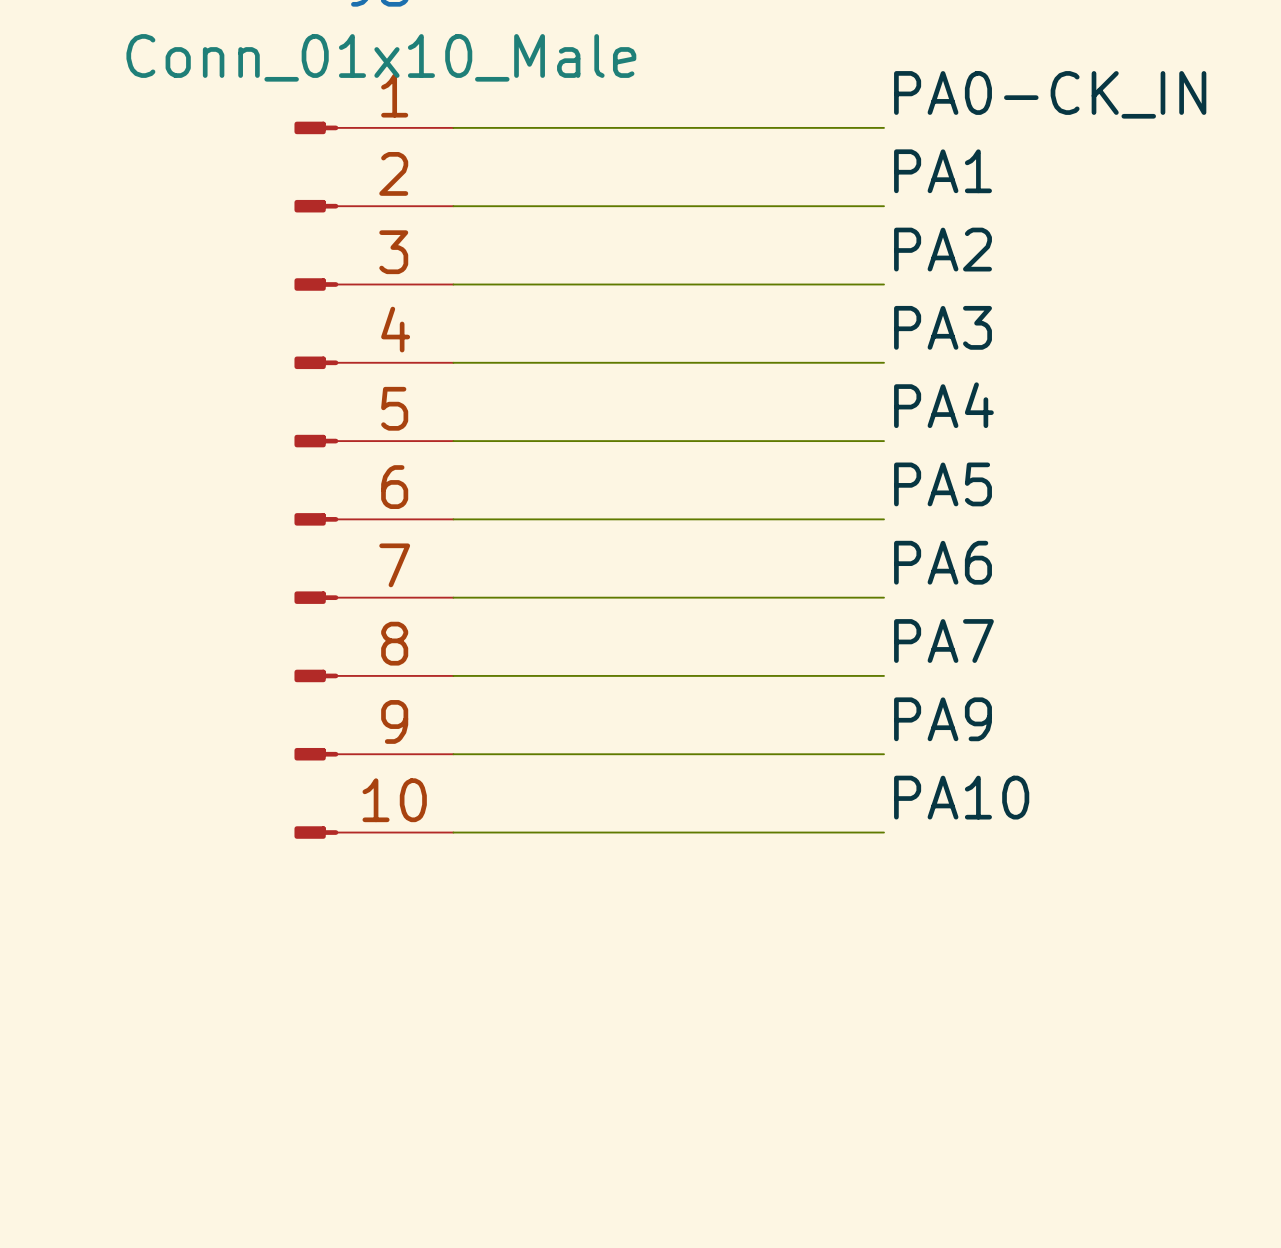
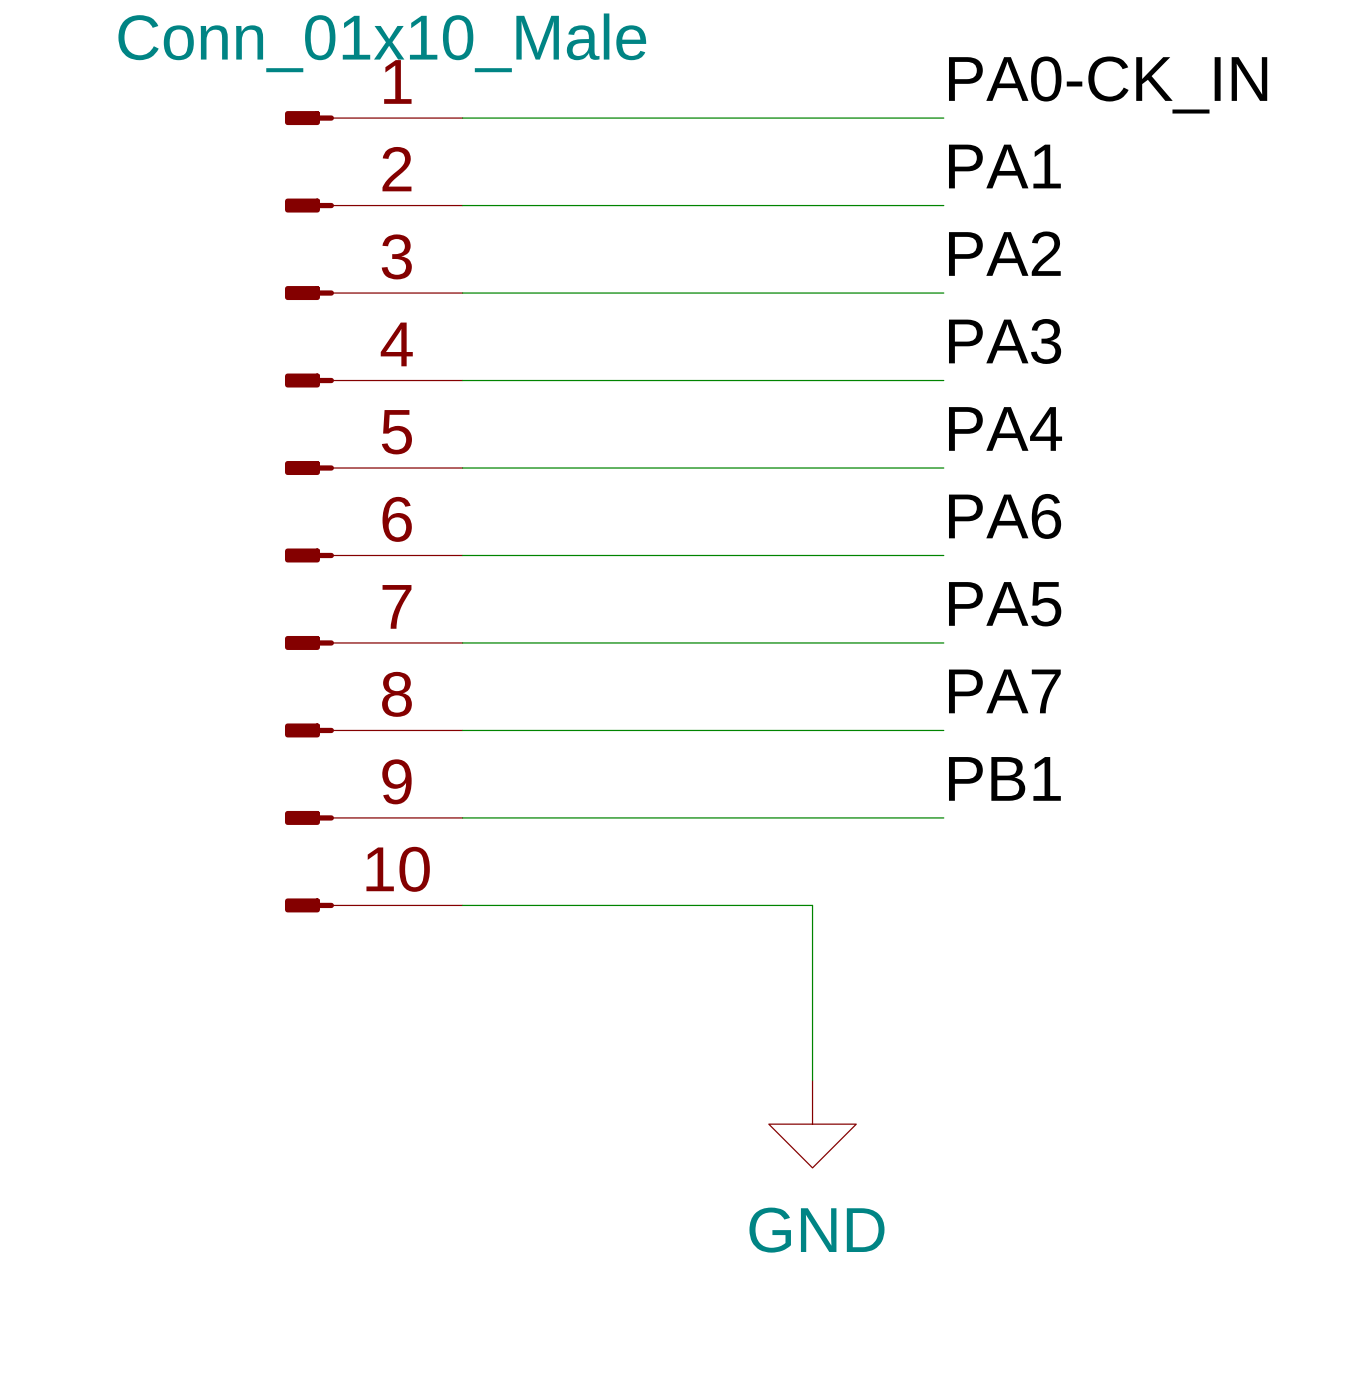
label: PA5 (943, 484) -> PA6 (1005, 516)
label: PA6 (943, 562) -> PA5 (1005, 604)
label: PA9 (943, 719) -> PB1 (1004, 778)
label: PA10 (961, 797) -> none
wire: (766, 832) (883, 832) -> (812, 905) (812, 1080)
power symbol: none -> GND (812, 1124)

